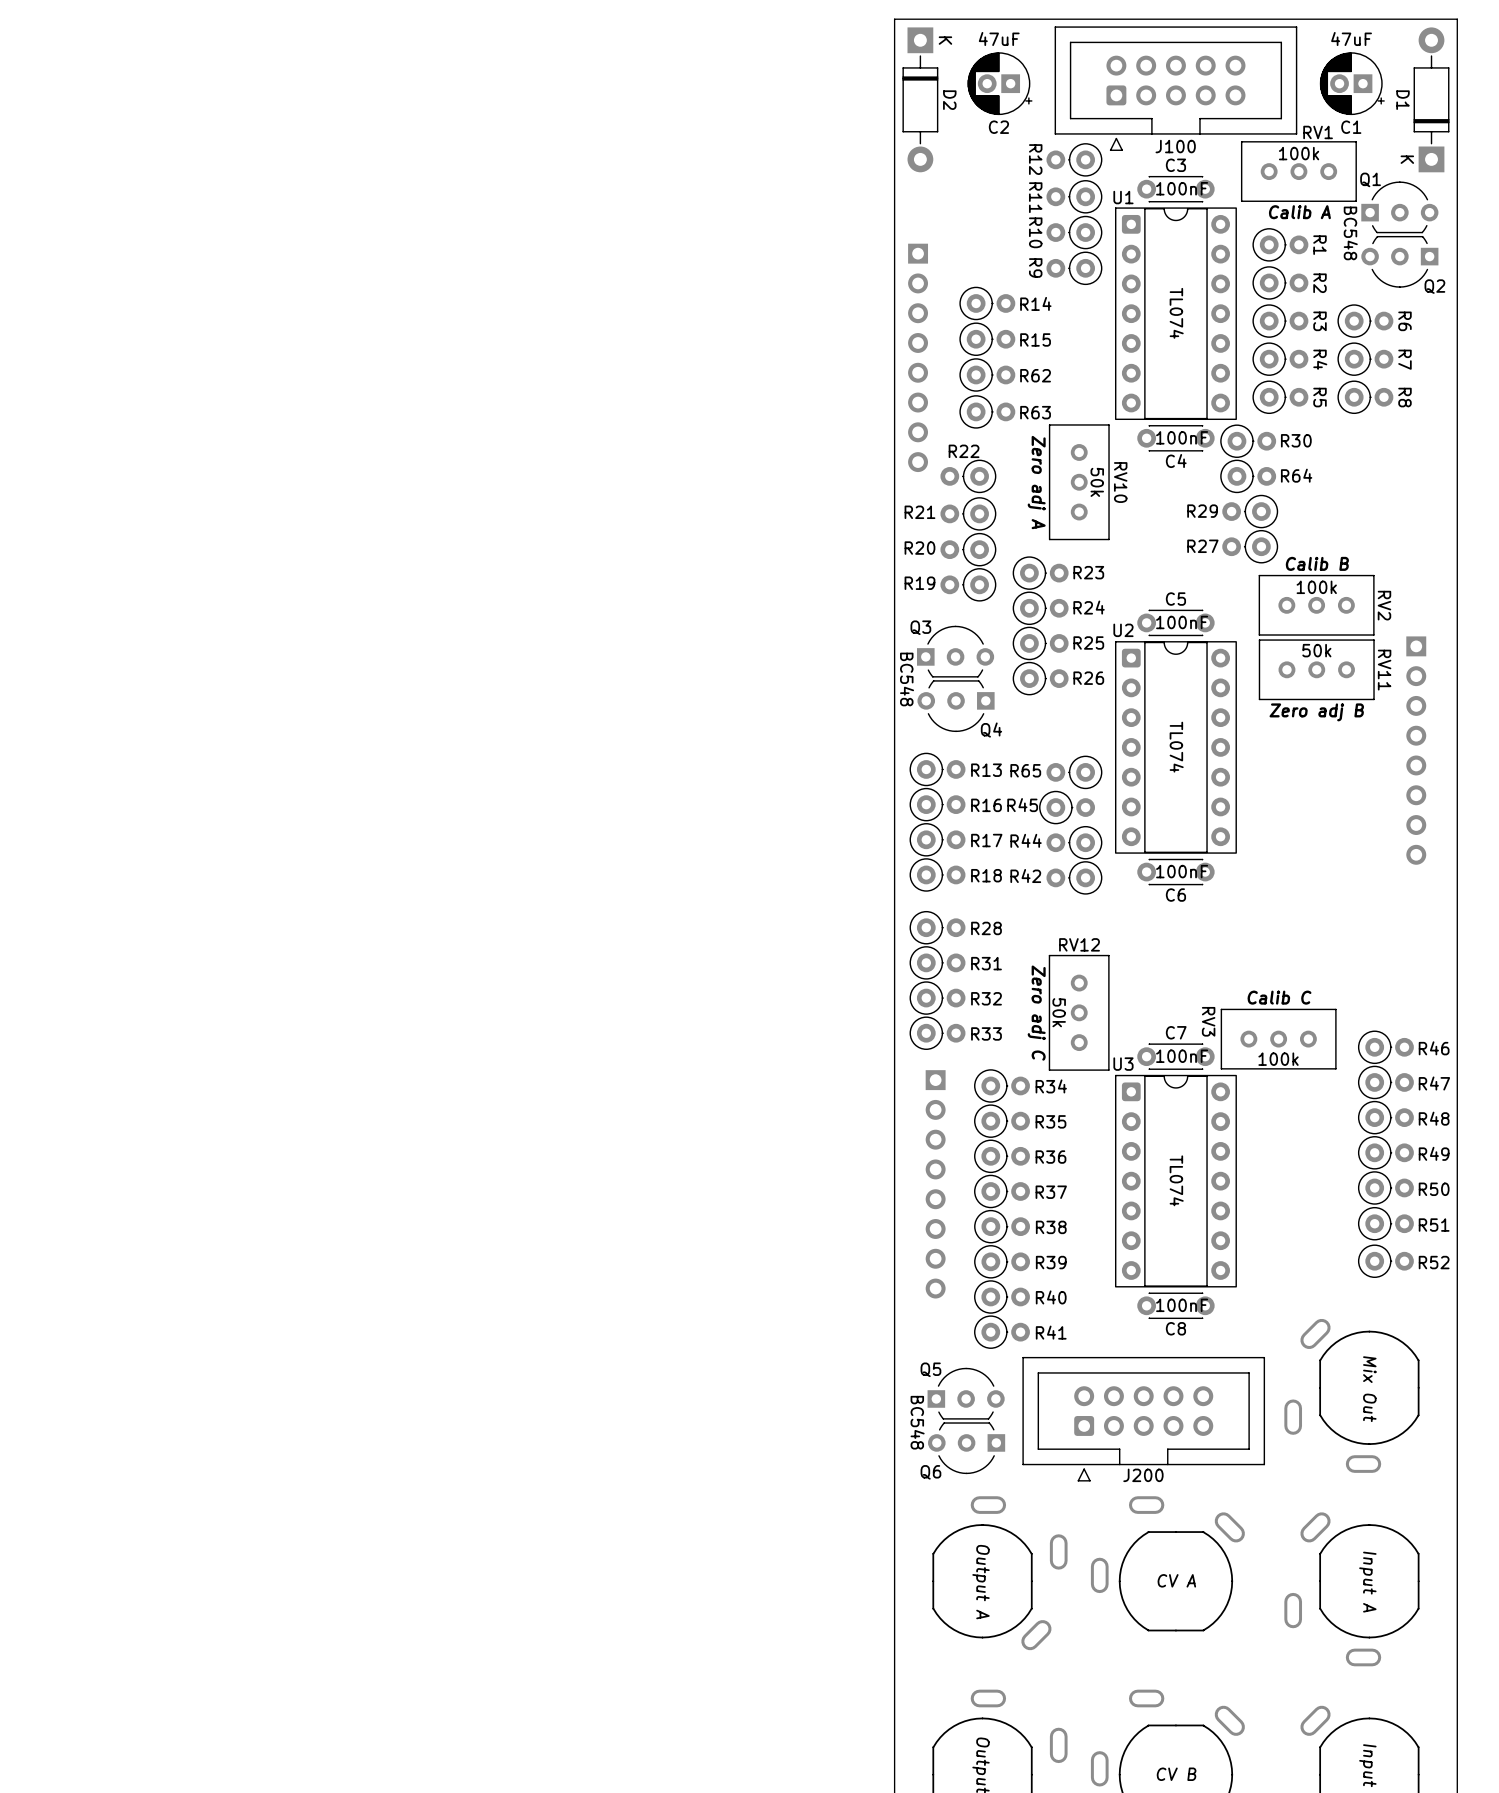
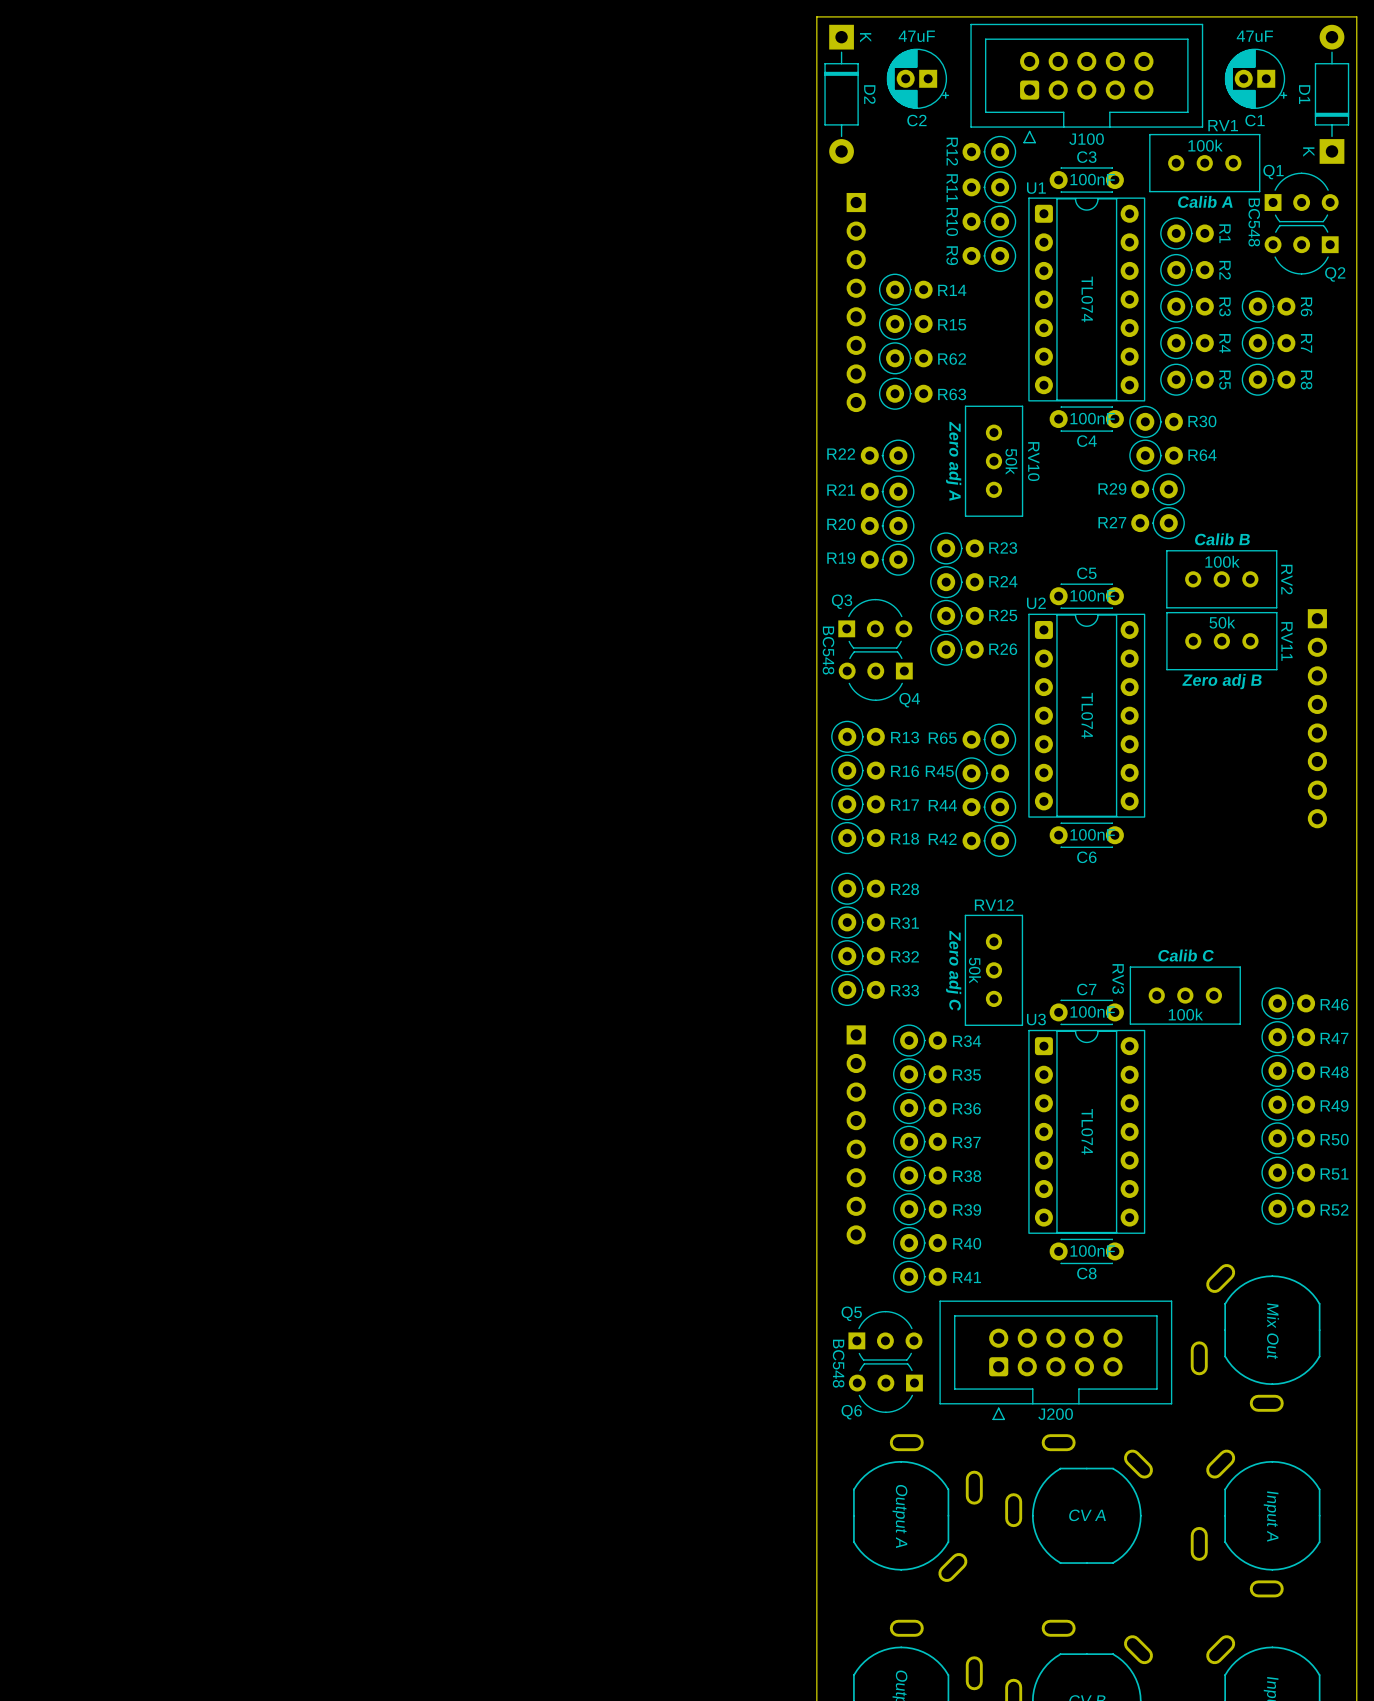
part position: (918, 357) -> (856, 302)
R22 name position: R22 (964, 451) -> R22 (841, 453)

